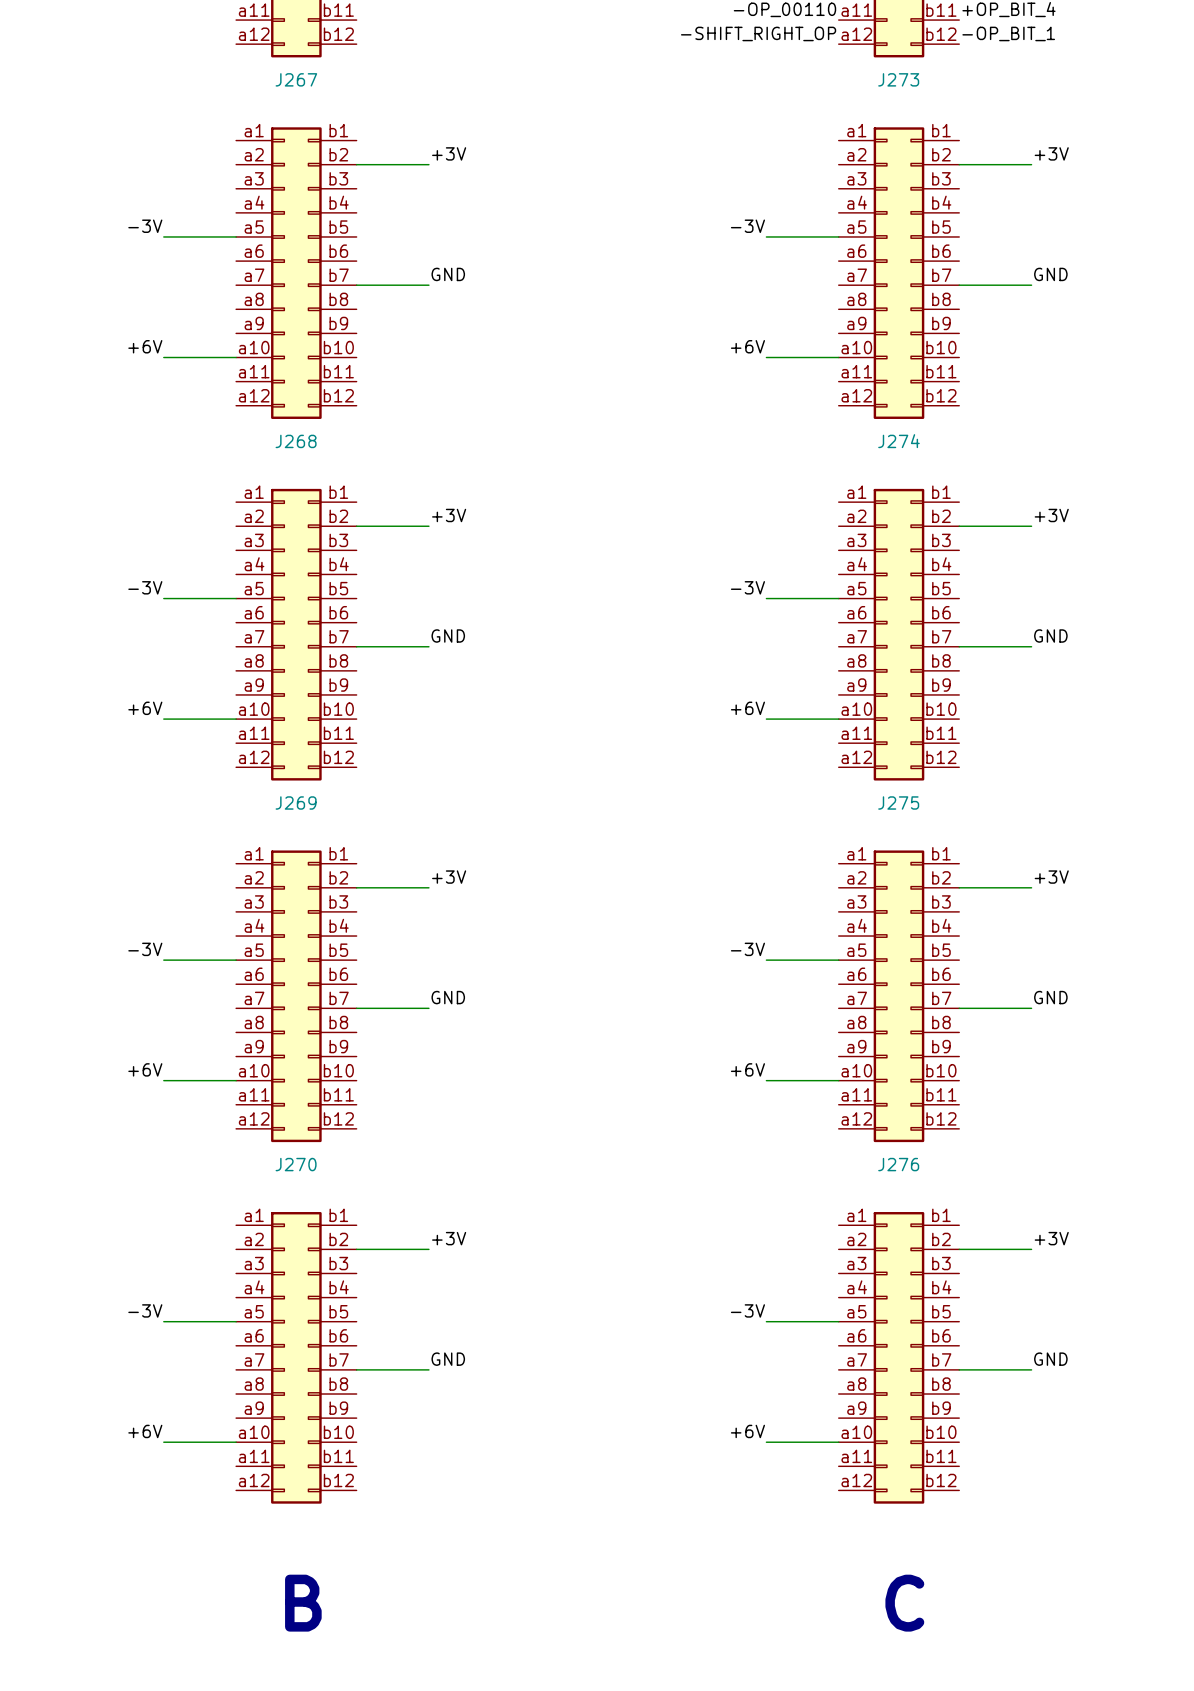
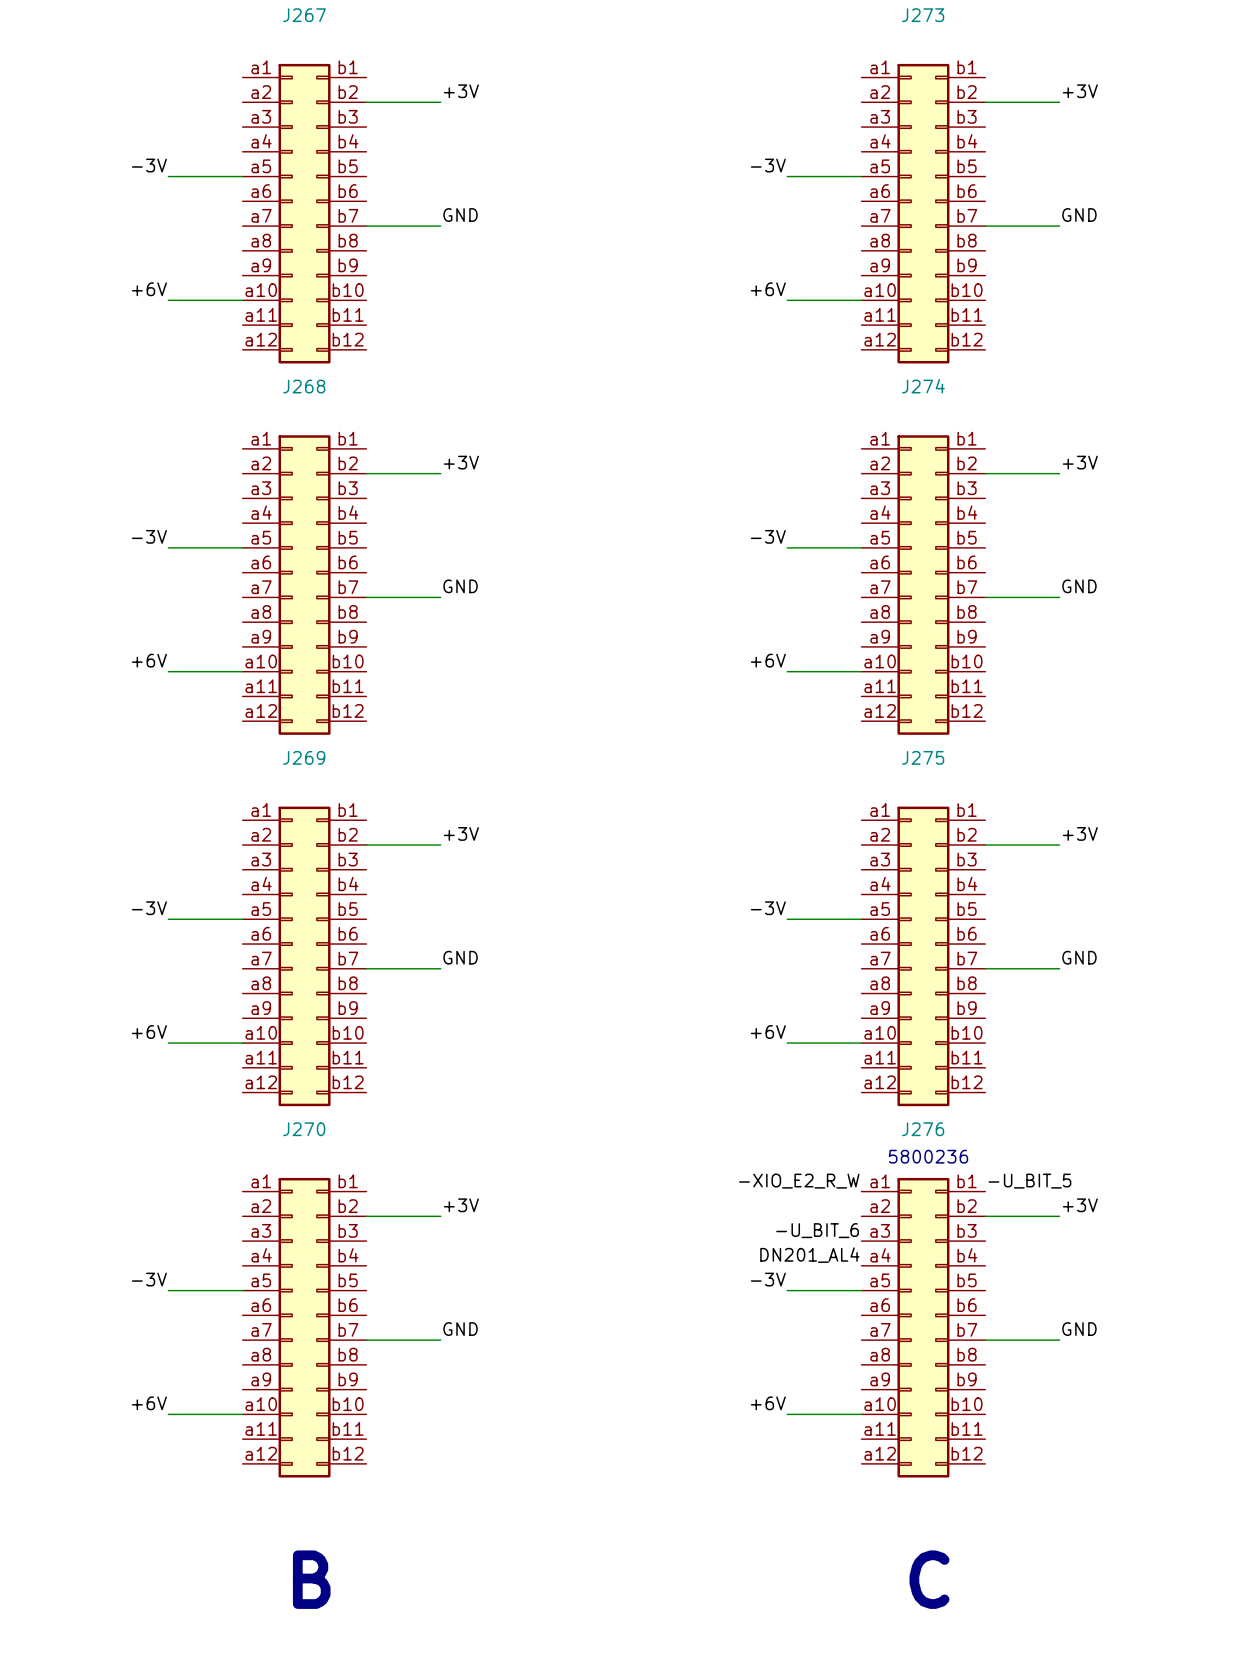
text: none -> 5800236 (928, 1156)
label: none -> -XIO_E2_R_W (799, 1181)
label: none -> -U_BIT_5 (1029, 1181)
label: none -> -U_BIT_6 (817, 1230)
label: none -> DN201_AL4 (809, 1255)

